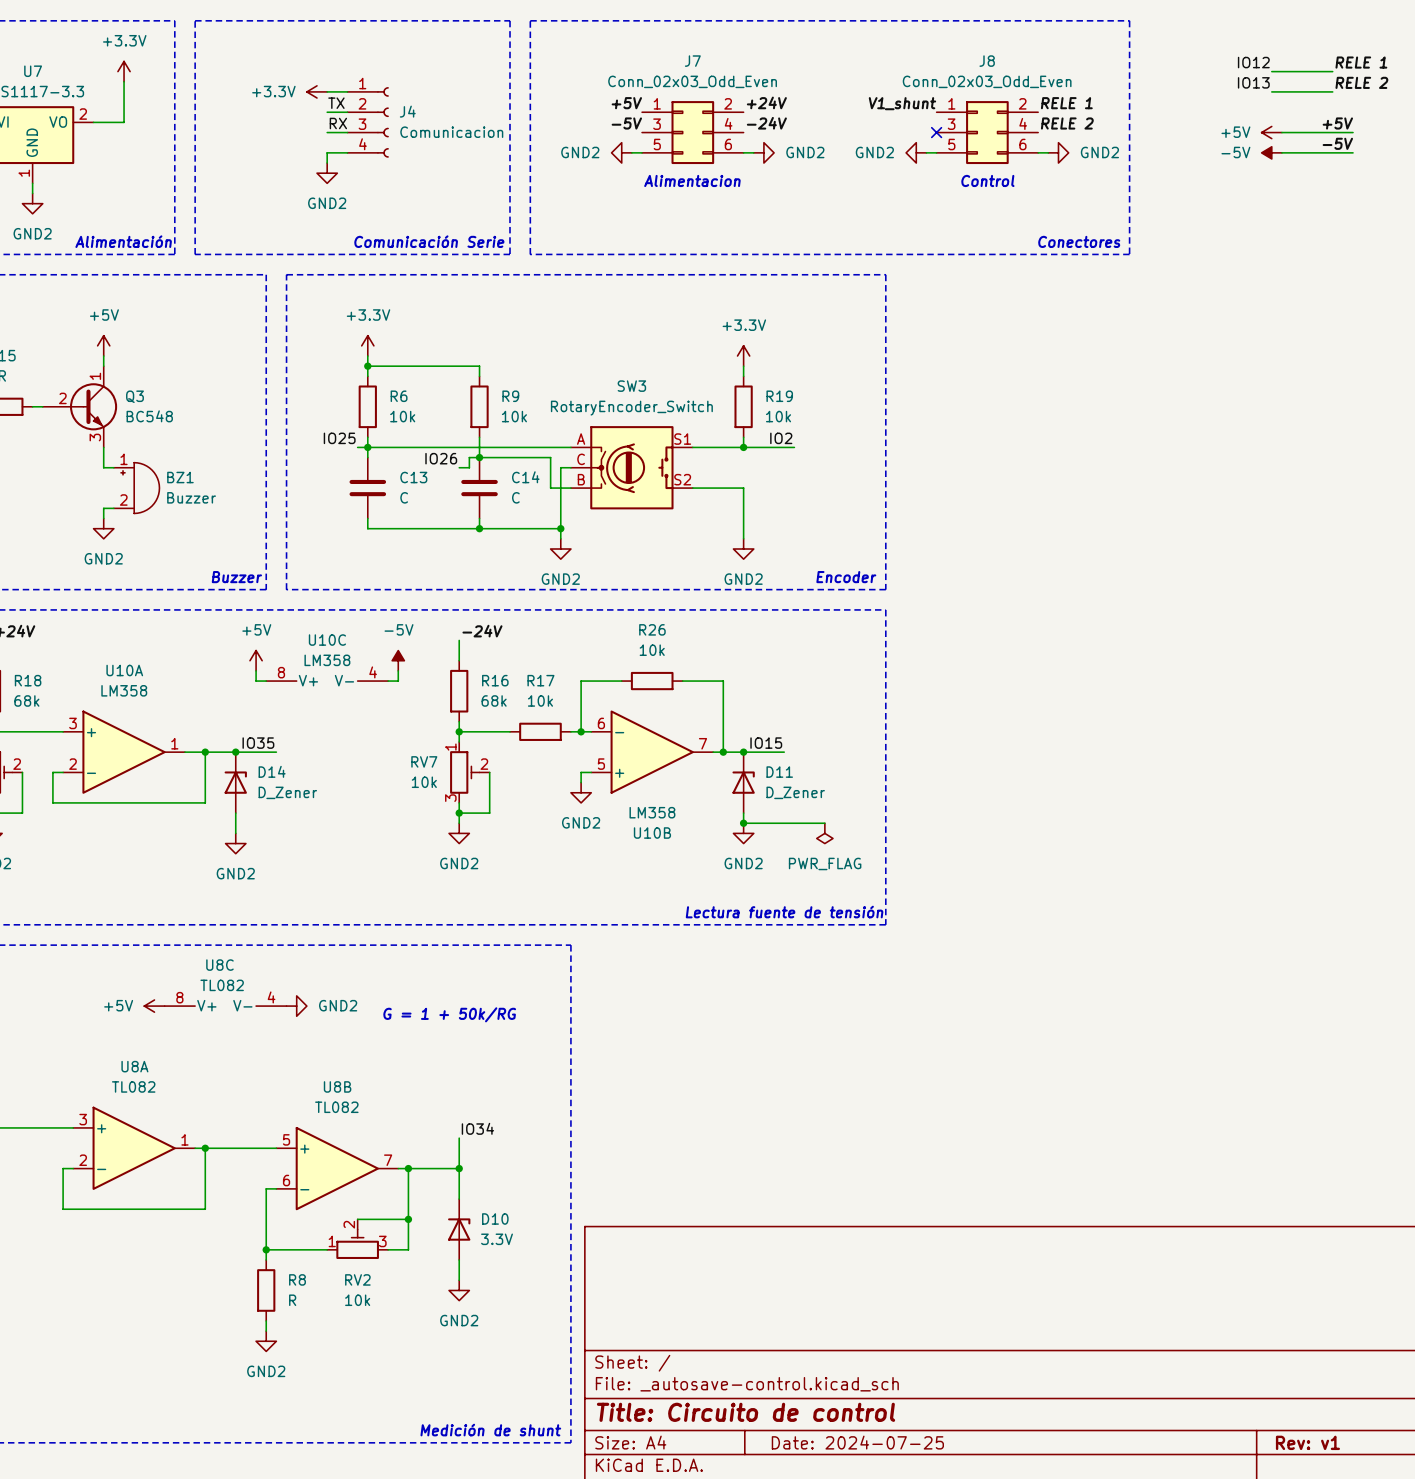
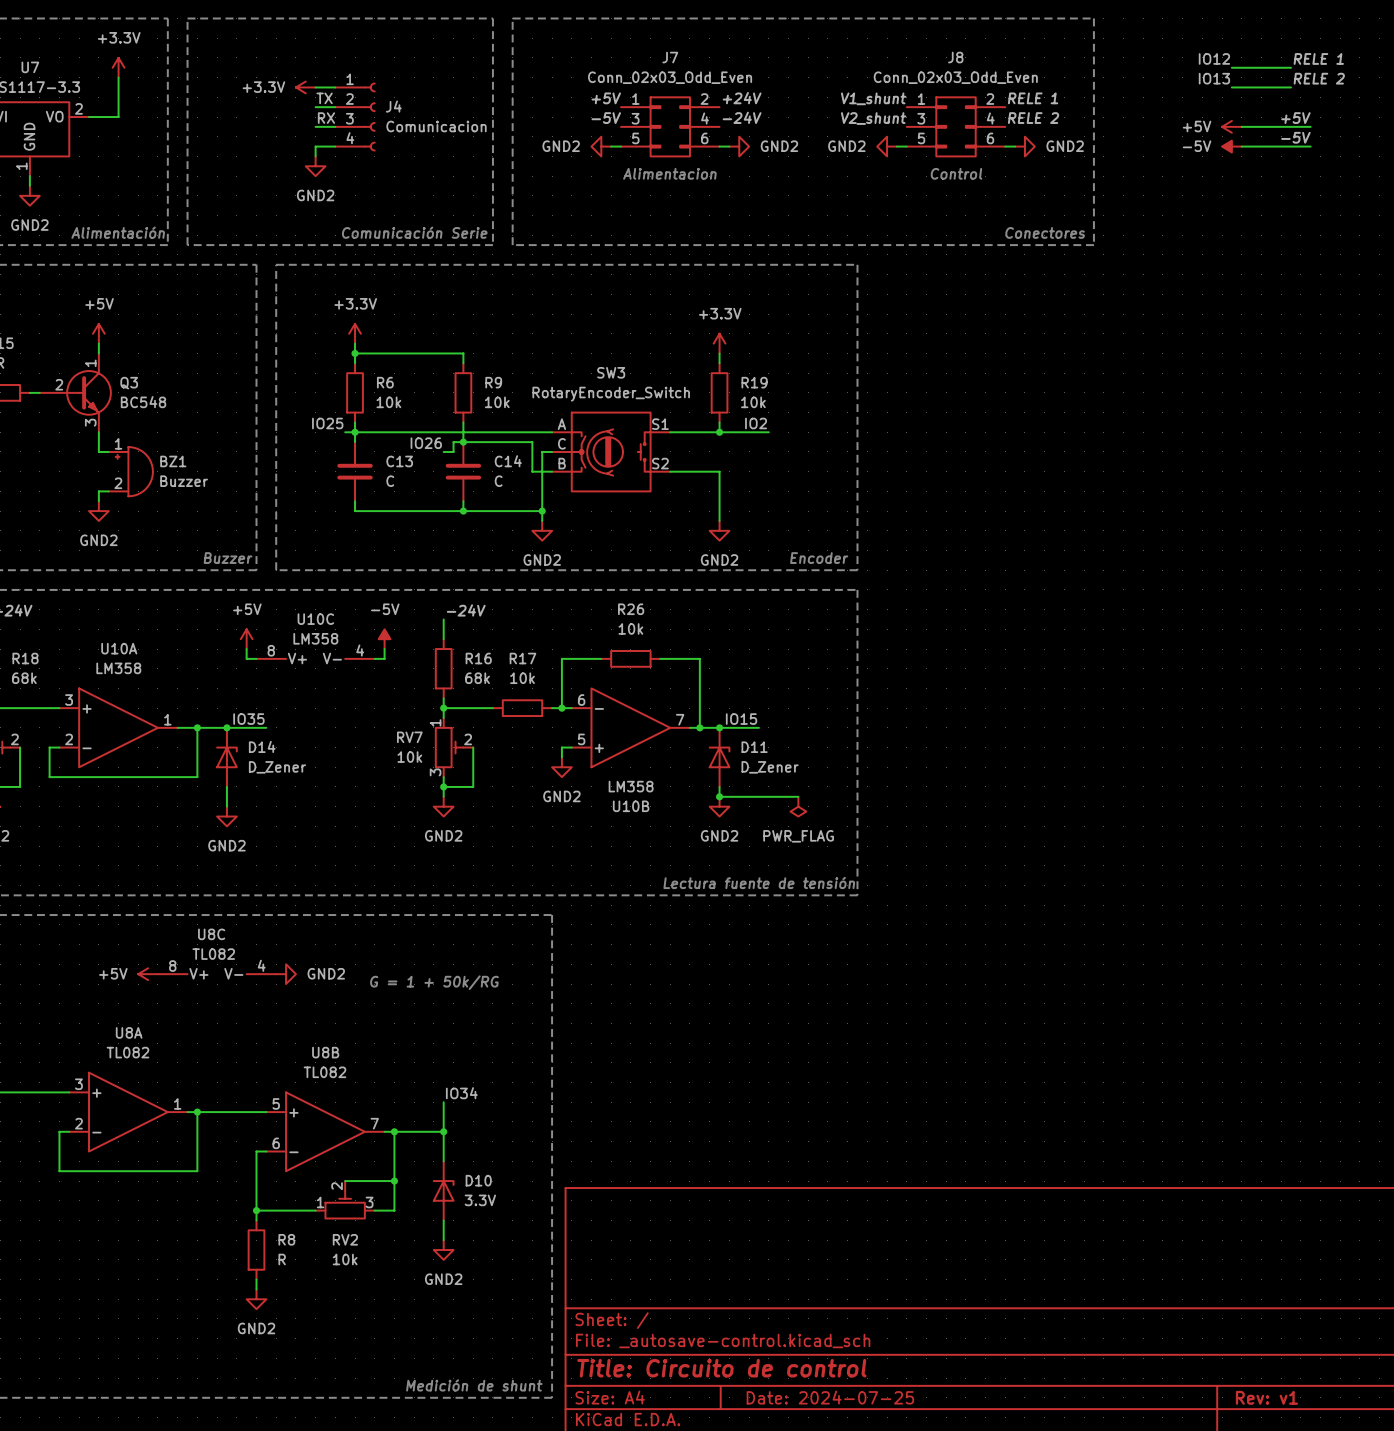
label: none -> V2_shunt (873, 118)
no-connect mark: (936, 132) -> none

